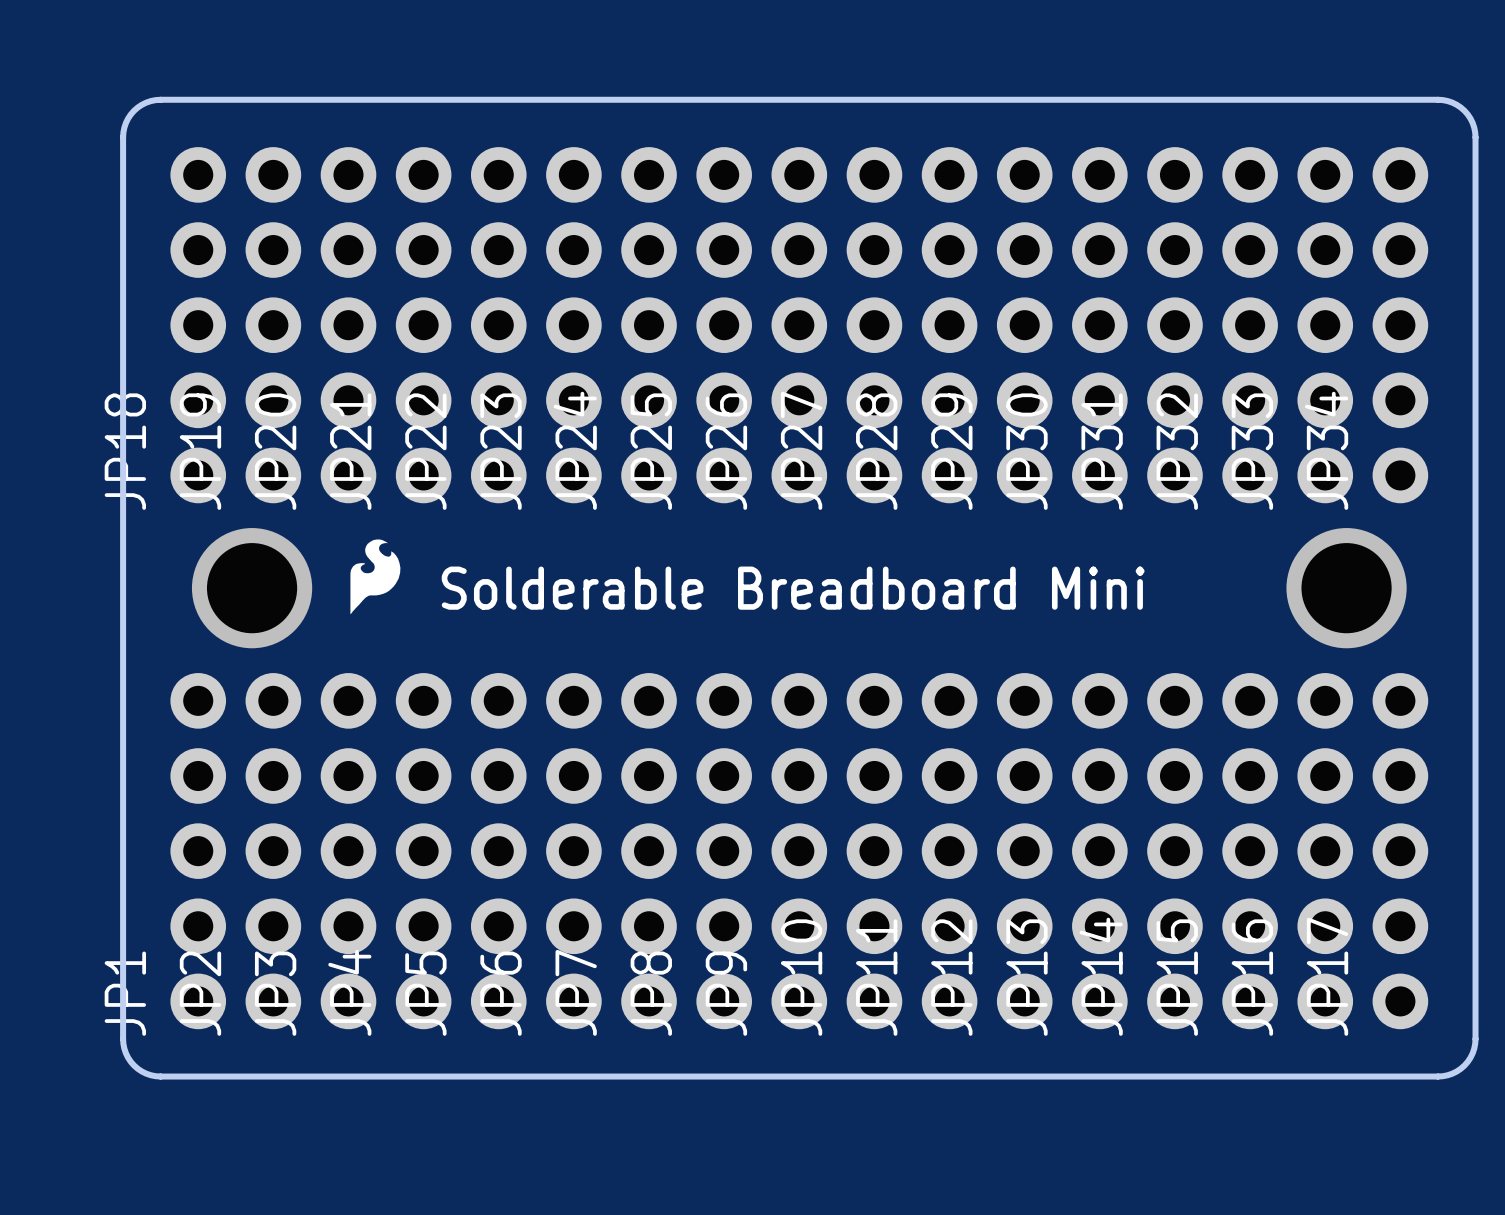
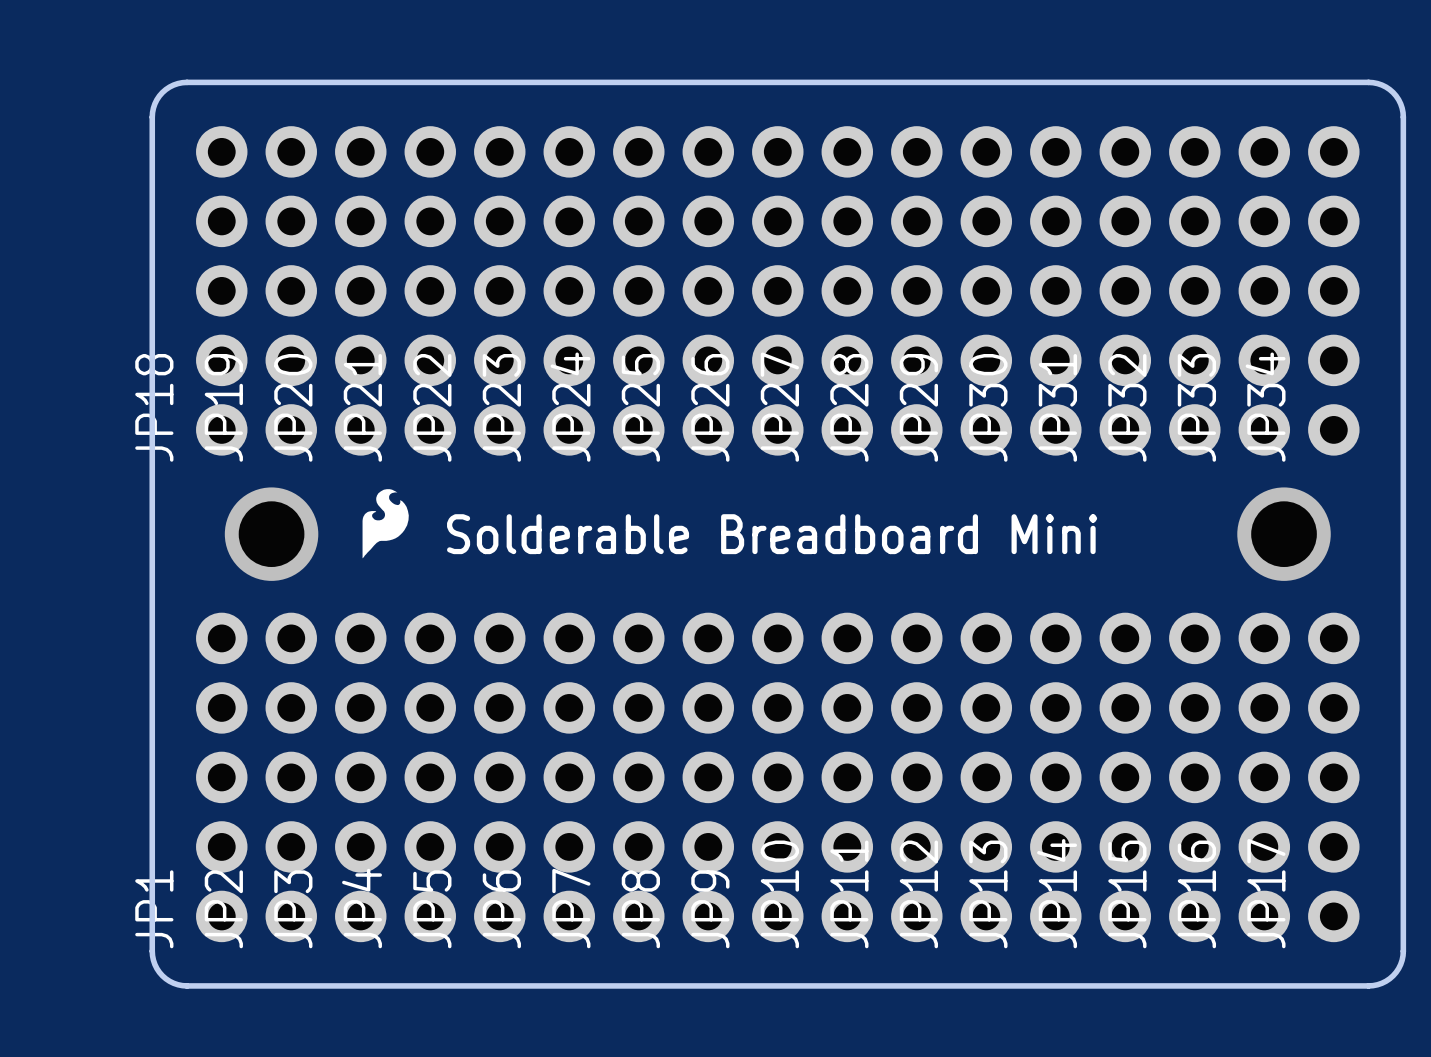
via size: [191, 528, 313, 649] -> [224, 487, 319, 581]
via size: [1286, 528, 1407, 649] -> [1237, 487, 1331, 581]

